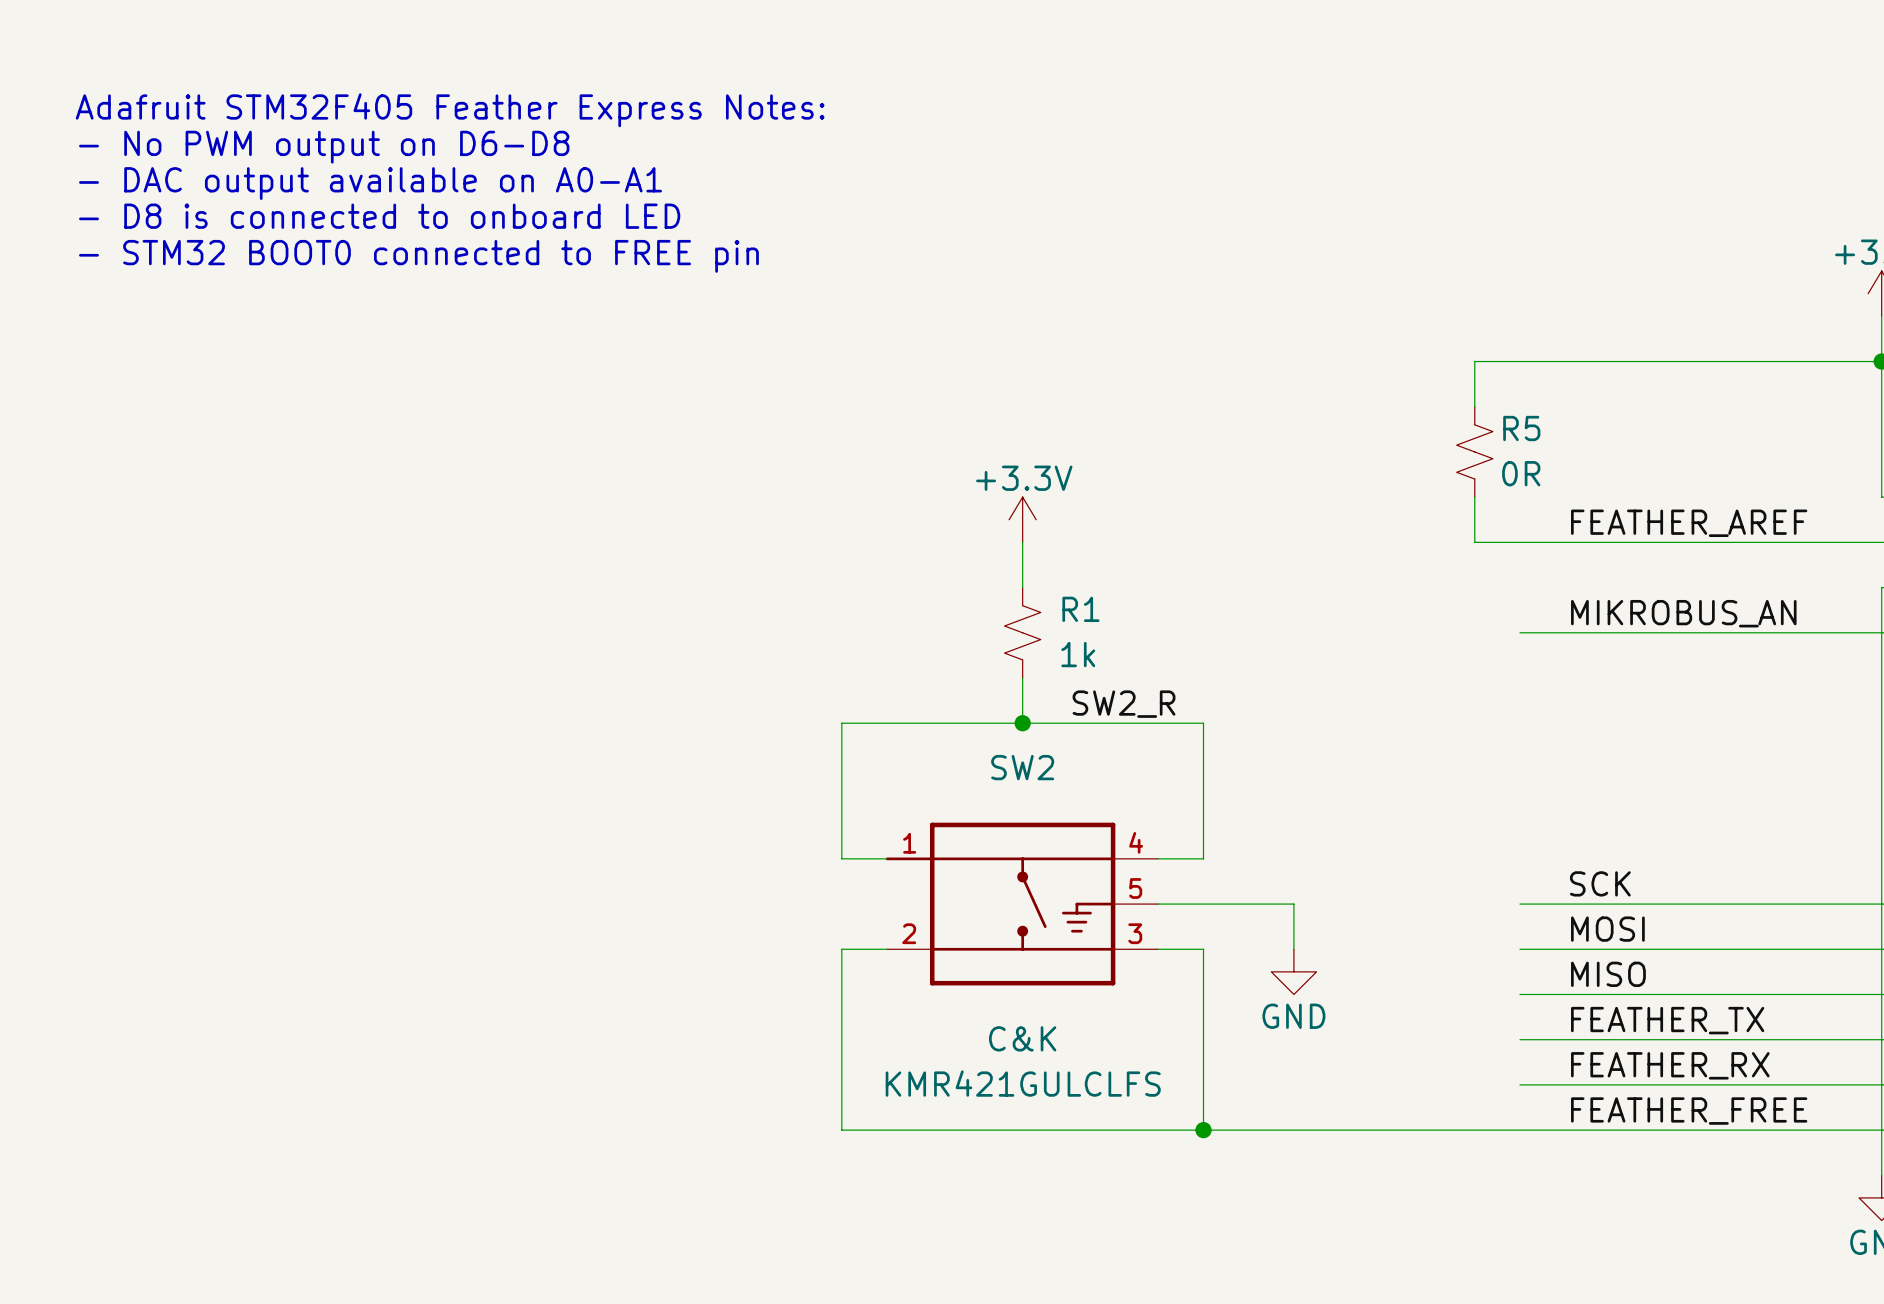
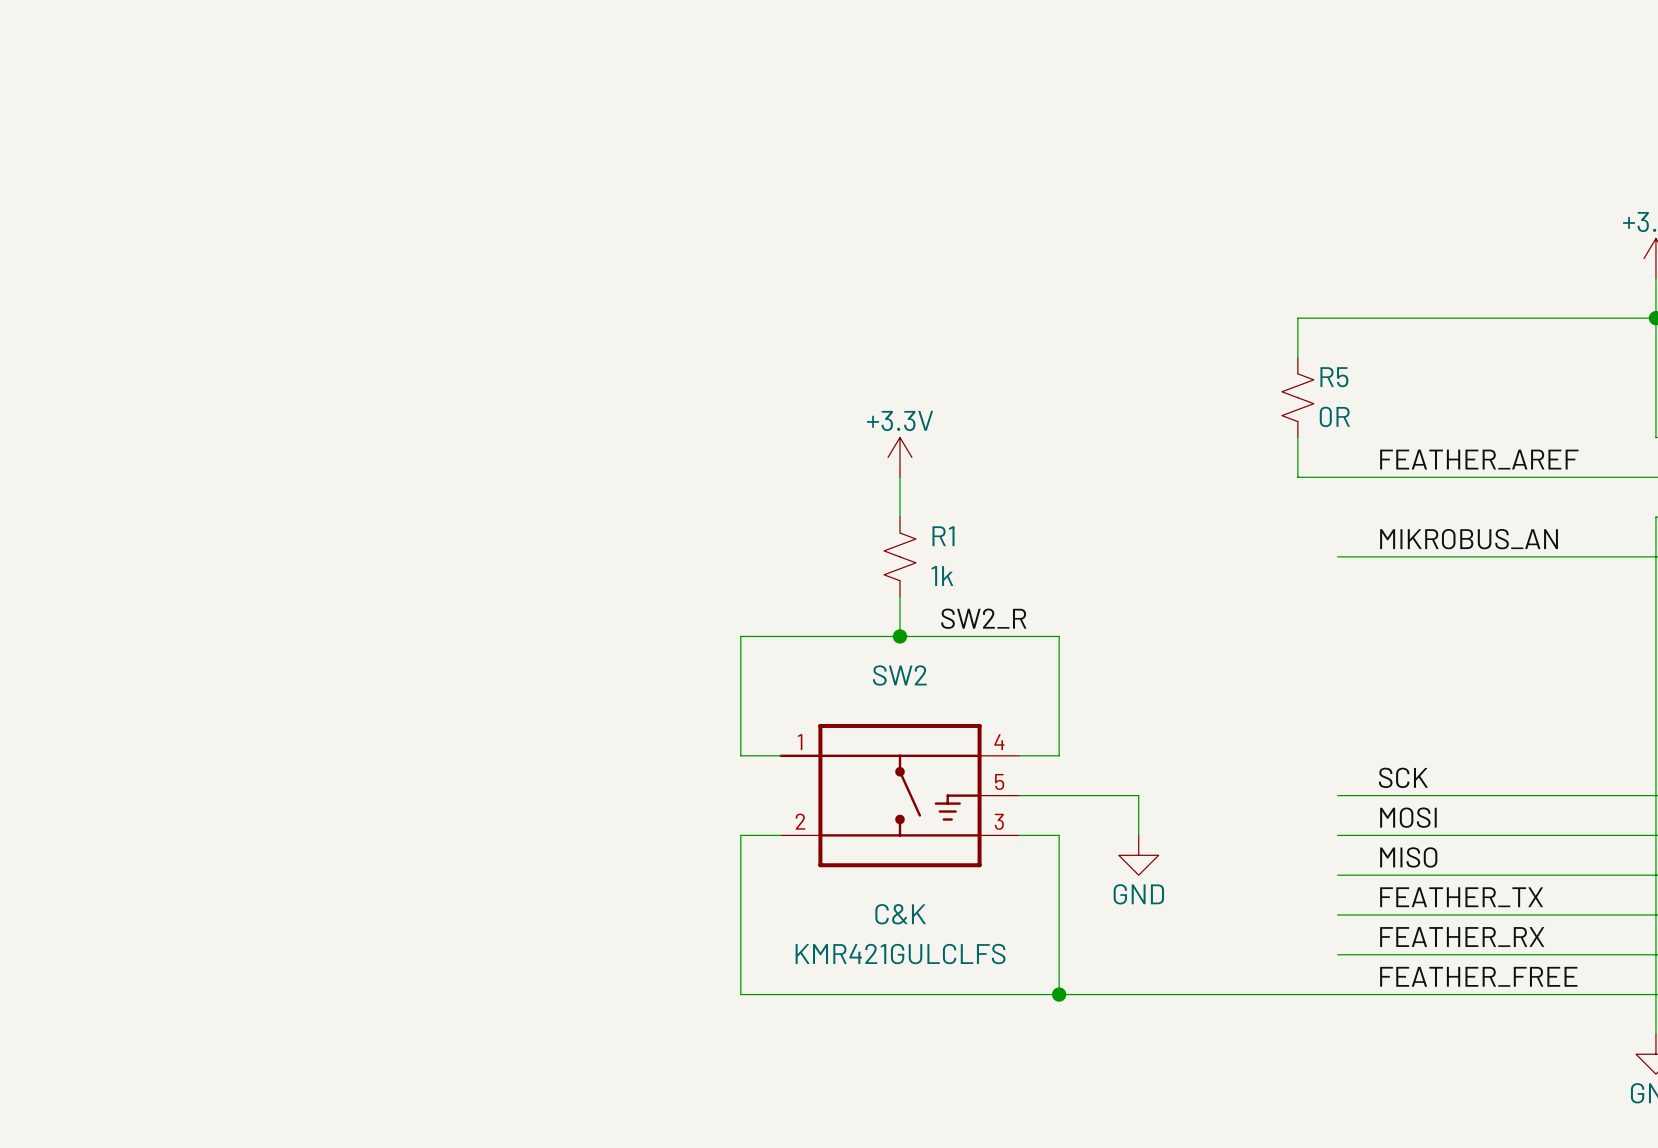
text: Adafruit STM32F405 Feather Express Notes: (450, 110) -> none
text: - No PWM output on D6-D8 (324, 147) -> none
text: - DAC output available on A0-A1 (370, 183) -> none
text: - D8 is connected to onboard LED (379, 216) -> none
text: - STM32 BOOT0 connected to FREE pin (418, 256) -> none

